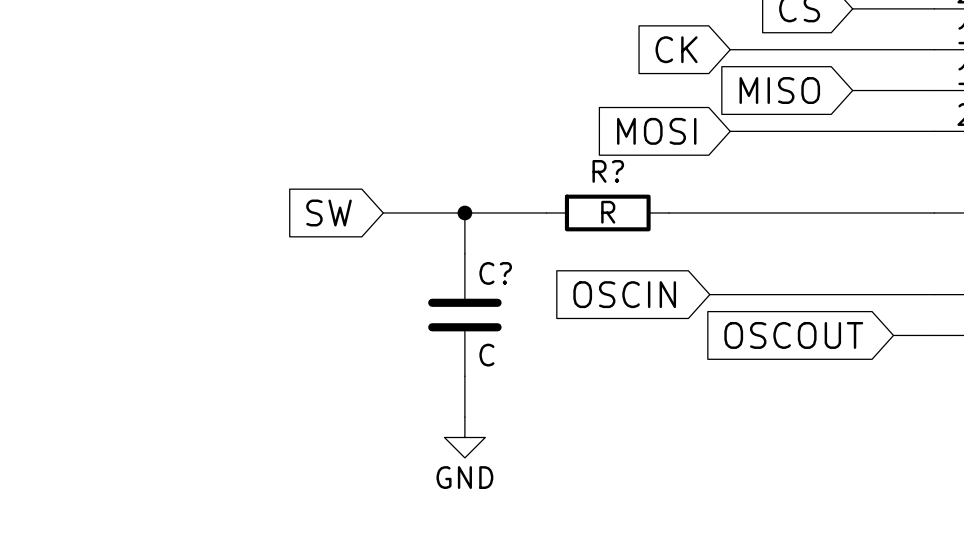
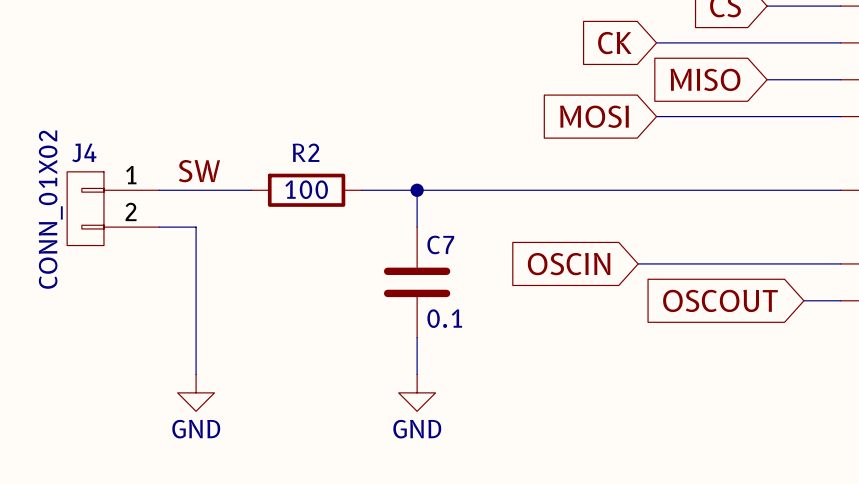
label: none -> SW (199, 171)
wire: none -> (159, 190) (251, 190)
global label: SW (329, 212) -> none
R2: none -> 100 (306, 190)
wire: none -> (490, 190) (601, 190)
R?: R (607, 212) -> none
J4: none -> CONN_01X02 (113, 208)
wire: none -> (159, 227) (196, 227) (196, 374)
C? name: C? (495, 273) -> C7 (440, 244)
C? value: C (486, 355) -> 0.1 (444, 318)
power symbol: none -> GND (196, 392)

